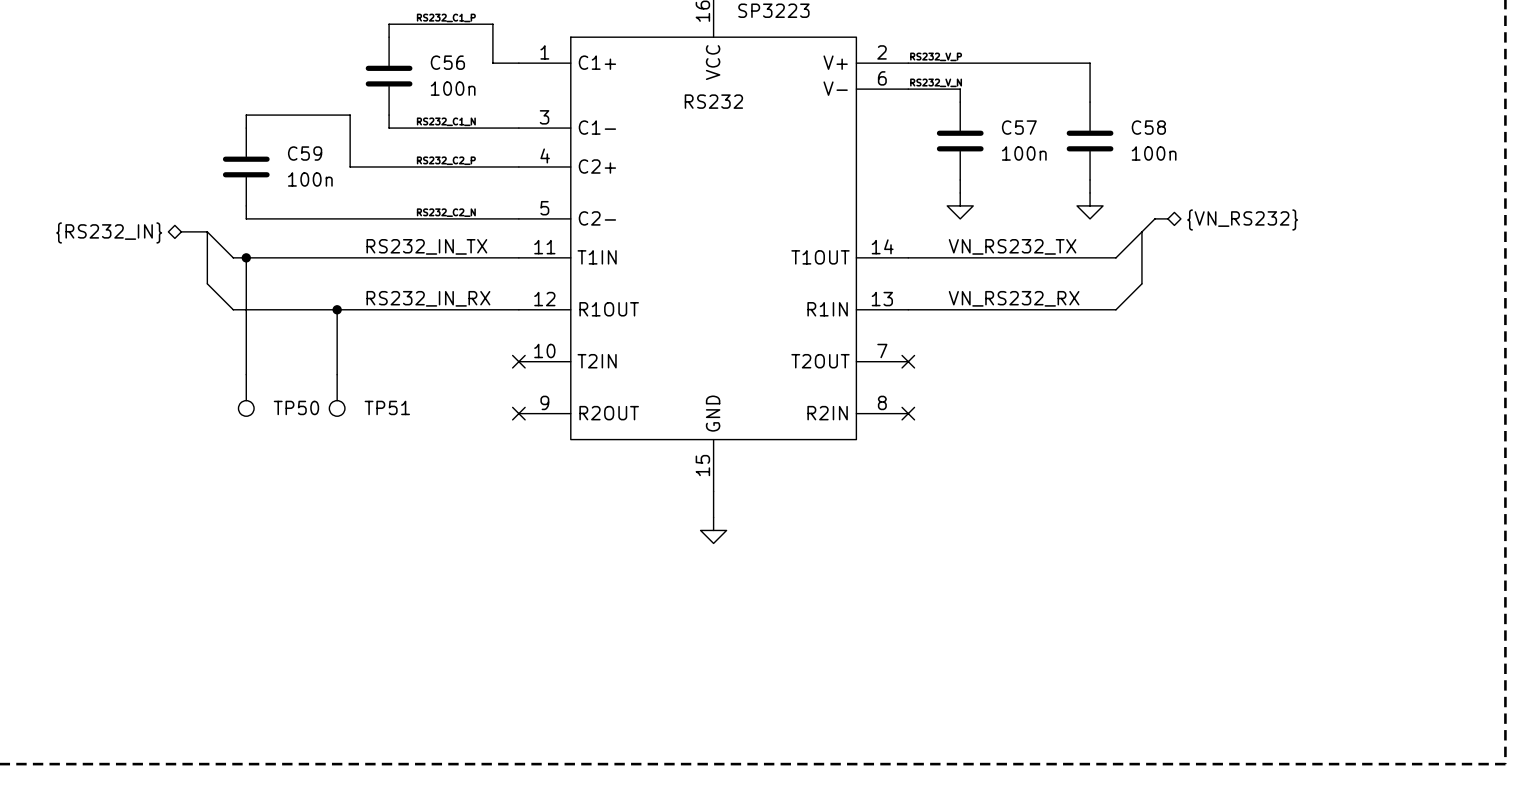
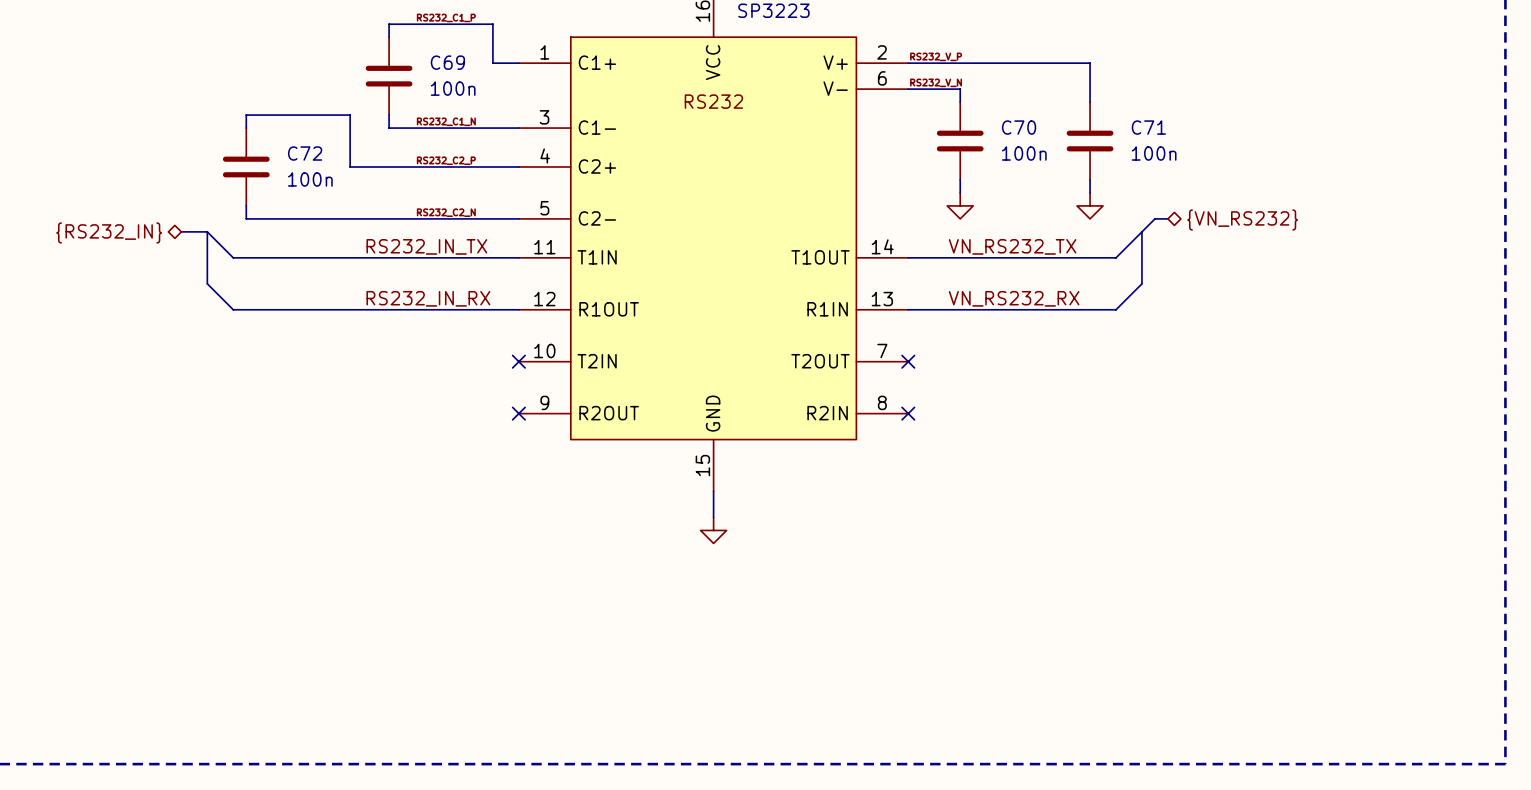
C56 name: C56 (447, 62) -> C69 (447, 62)
C57 name: C57 (1019, 127) -> C70 (1019, 127)
C58 name: C58 (1148, 127) -> C71 (1148, 127)
C59 name: C59 (305, 153) -> C72 (305, 153)
wire: (246, 257) (246, 374) -> none
junction: (246, 257) -> none
wire: (337, 309) (337, 374) -> none
junction: (337, 309) -> none
TP50: (246, 395) -> none
TP51: (337, 395) -> none

